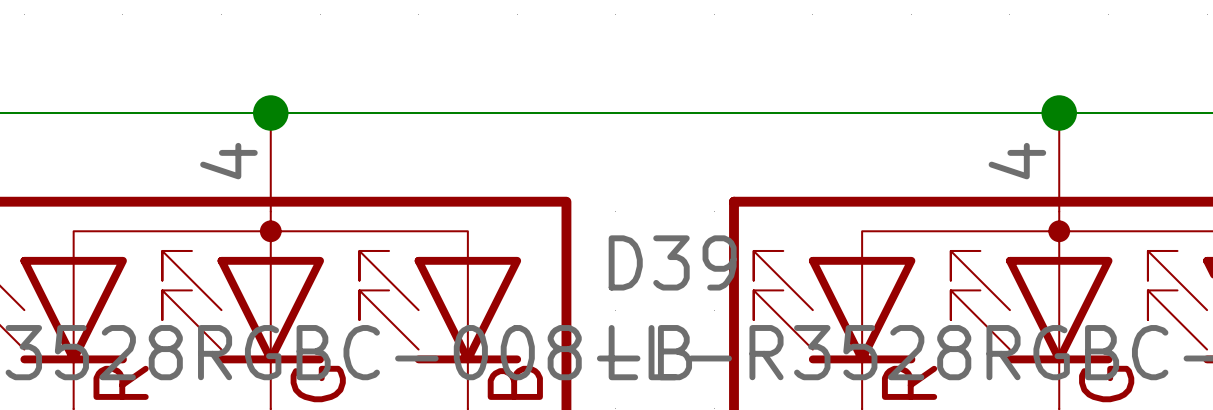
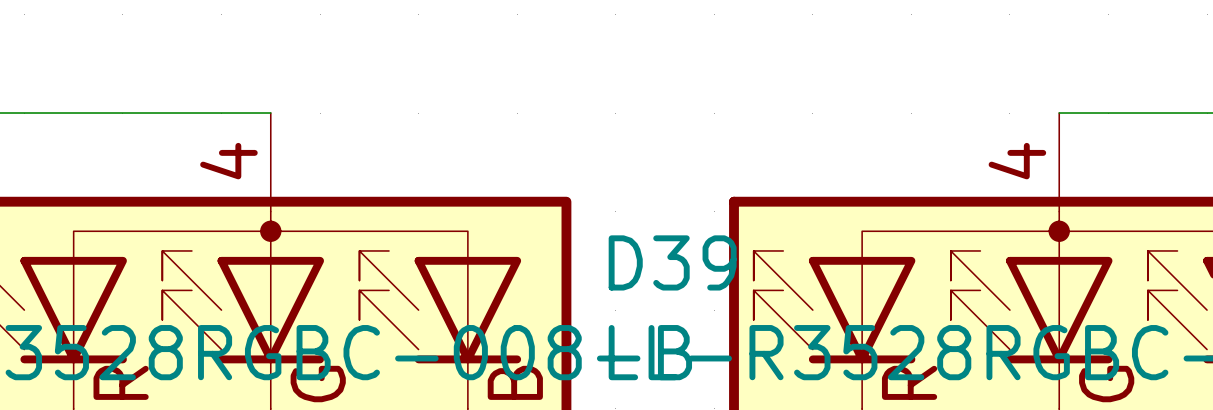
wire: (270, 113) (1059, 113) -> none
junction: (270, 113) -> none
junction: (1059, 113) -> none

